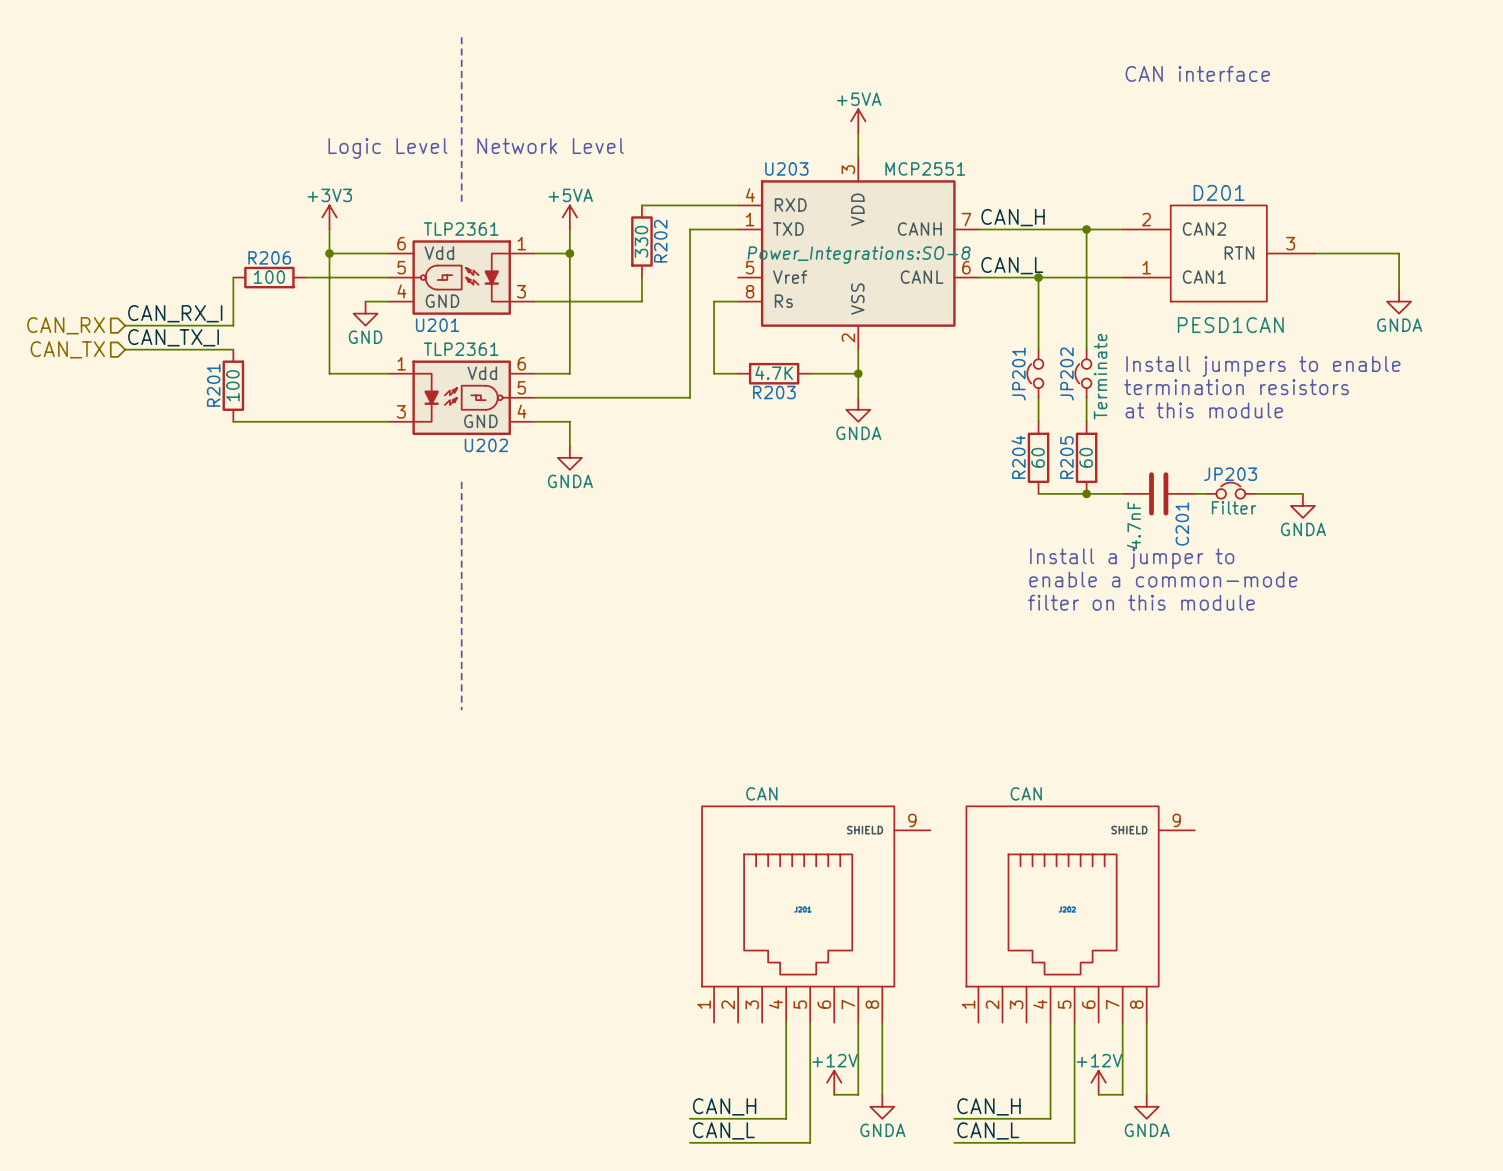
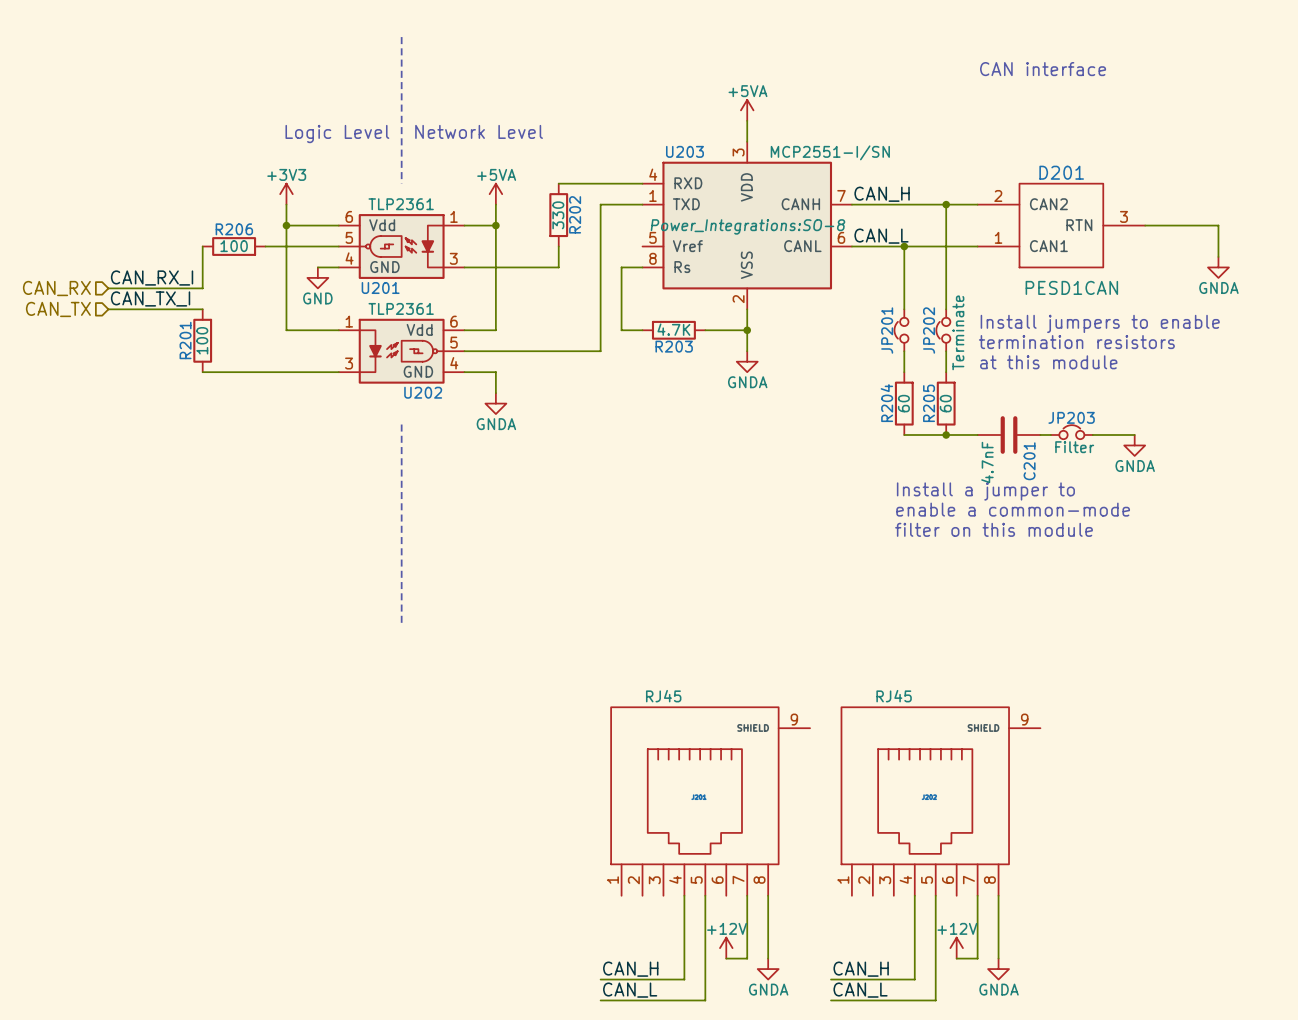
U203 value: MCP2551 (925, 168) -> MCP2551-I/SN (830, 152)
part value: CAN (761, 793) -> RJ45 (663, 696)
part value: CAN (1026, 793) -> RJ45 (894, 696)

